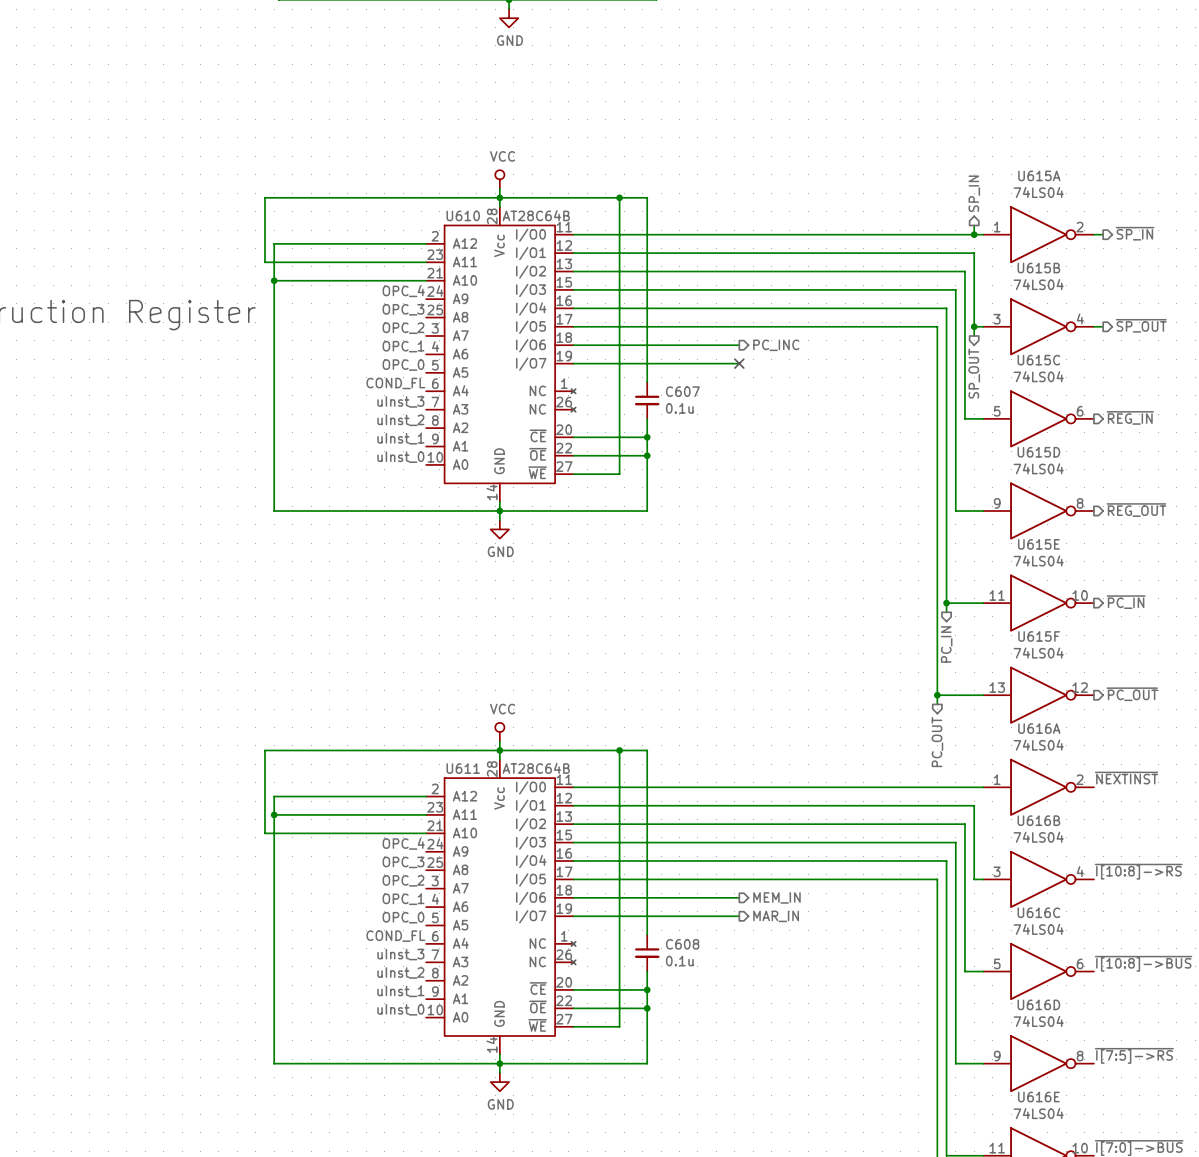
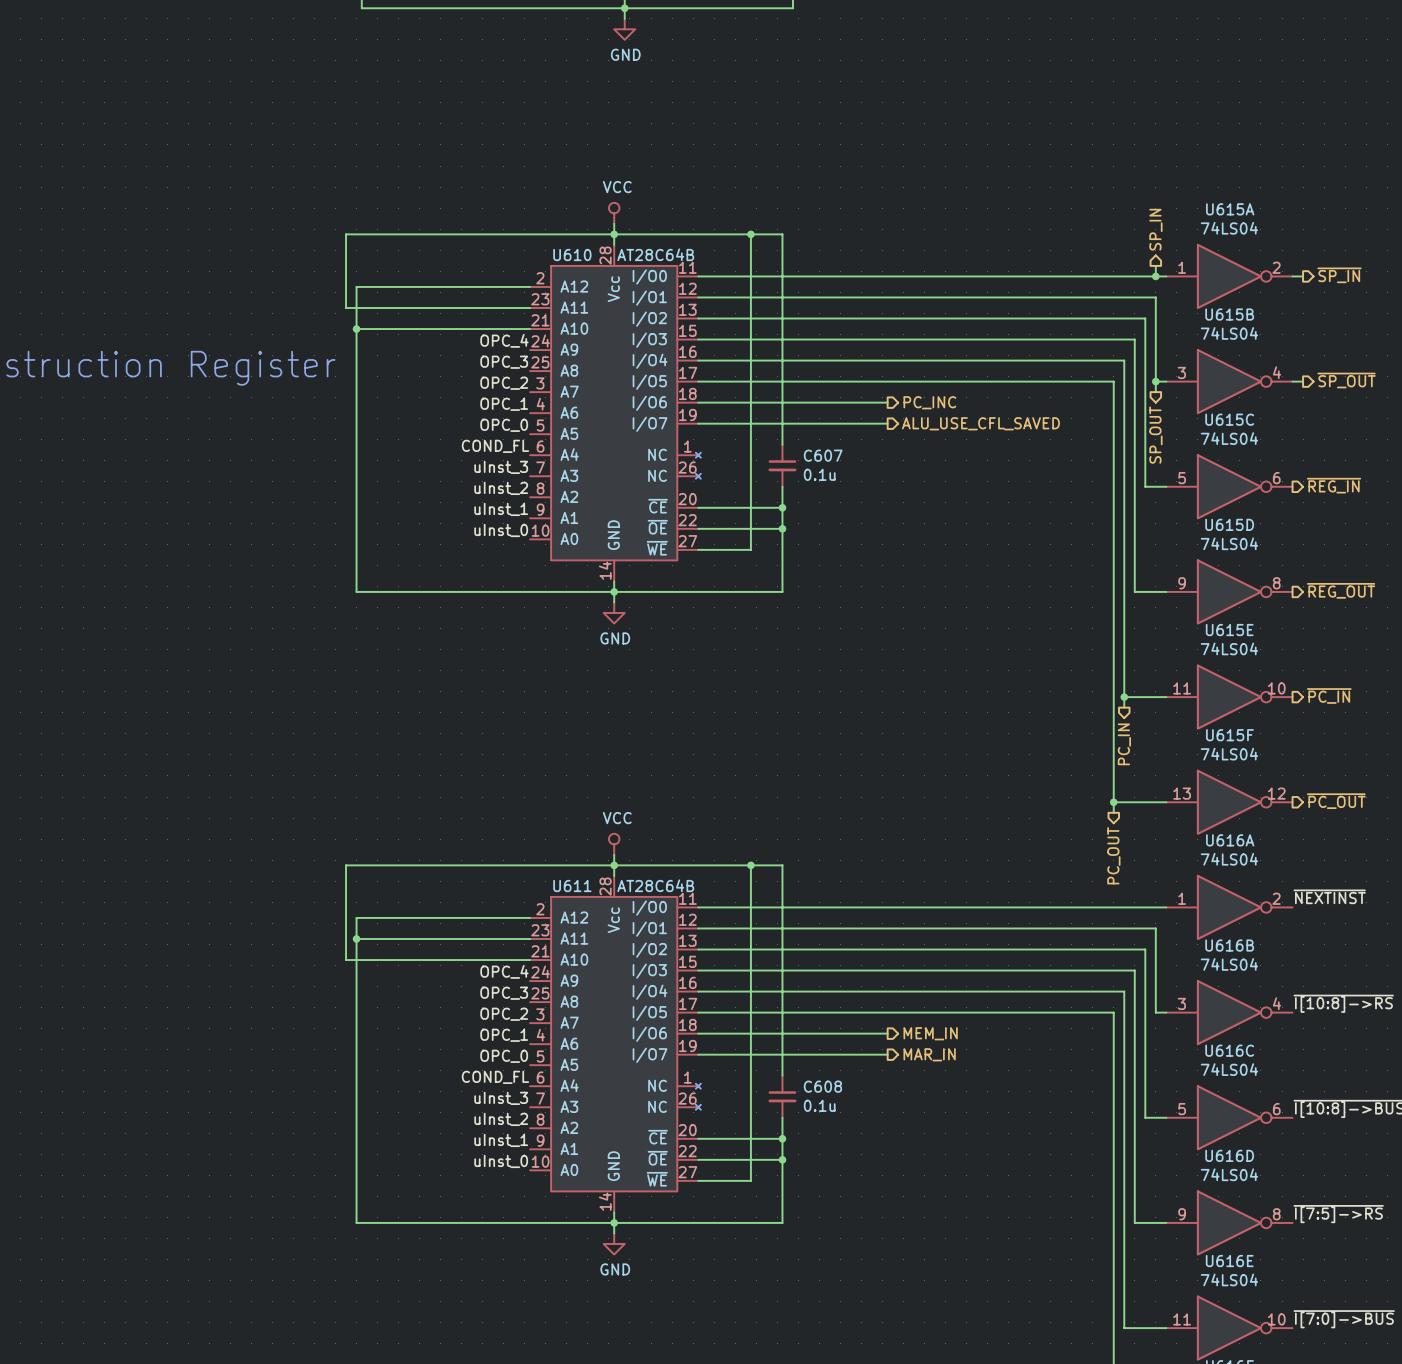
no-connect mark: (739, 363) -> none
hierarchical label: none -> ALU_USE_CFL_SAVED (980, 423)

